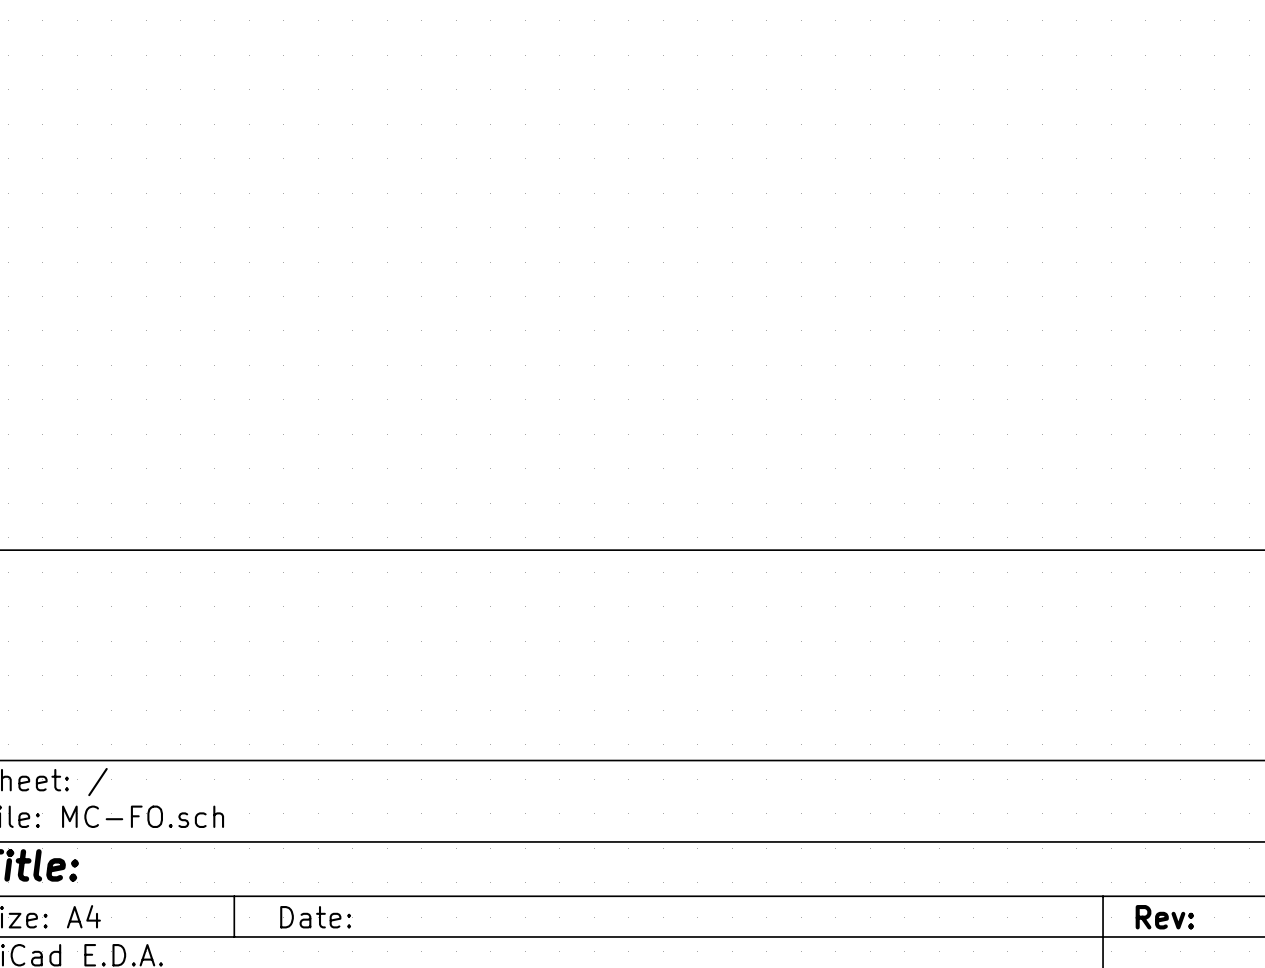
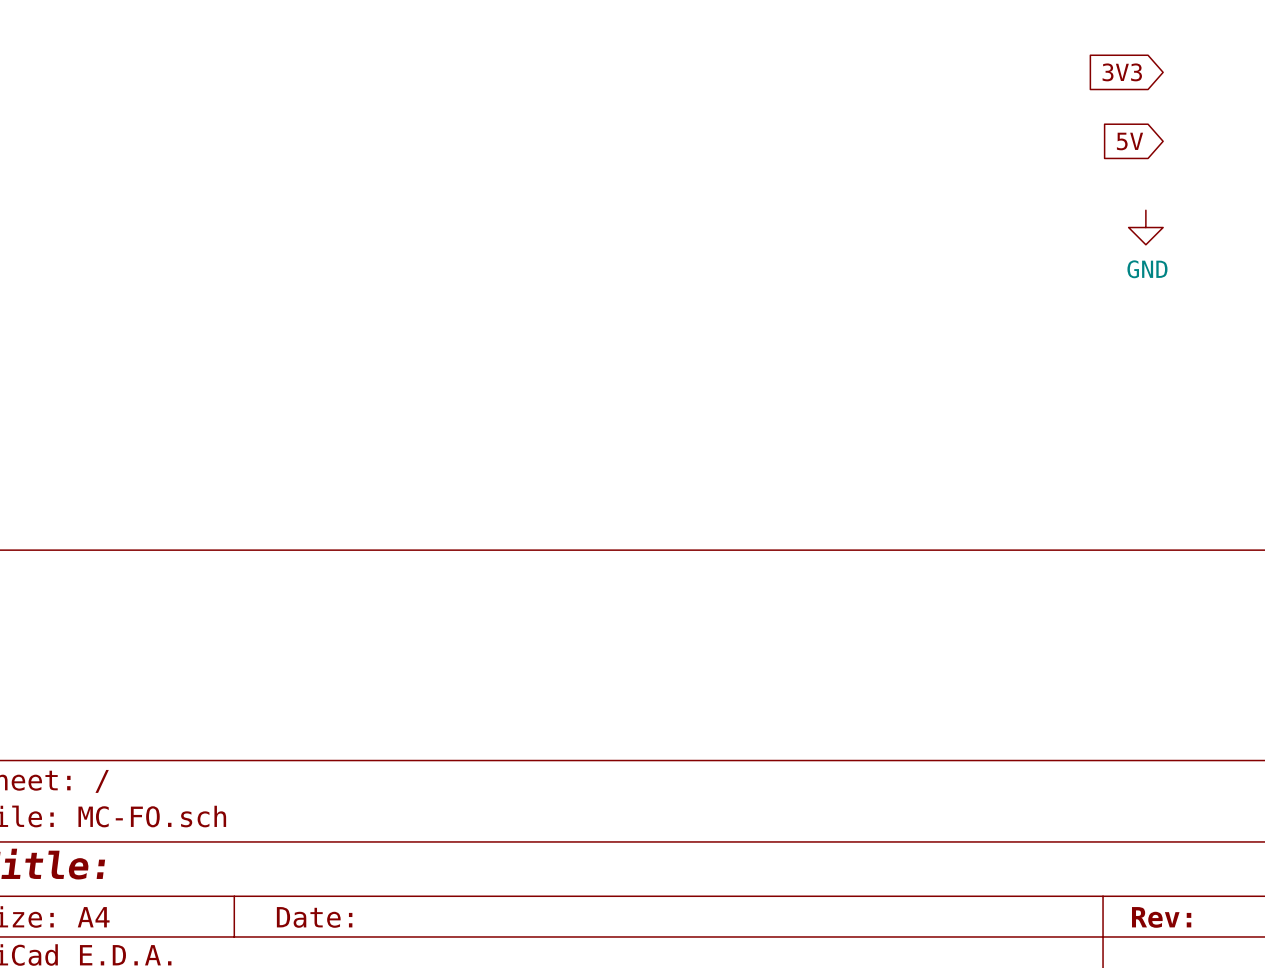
global label: none -> 3V3 (1122, 72)
global label: none -> 5V (1129, 141)
power symbol: none -> GND (1145, 227)

